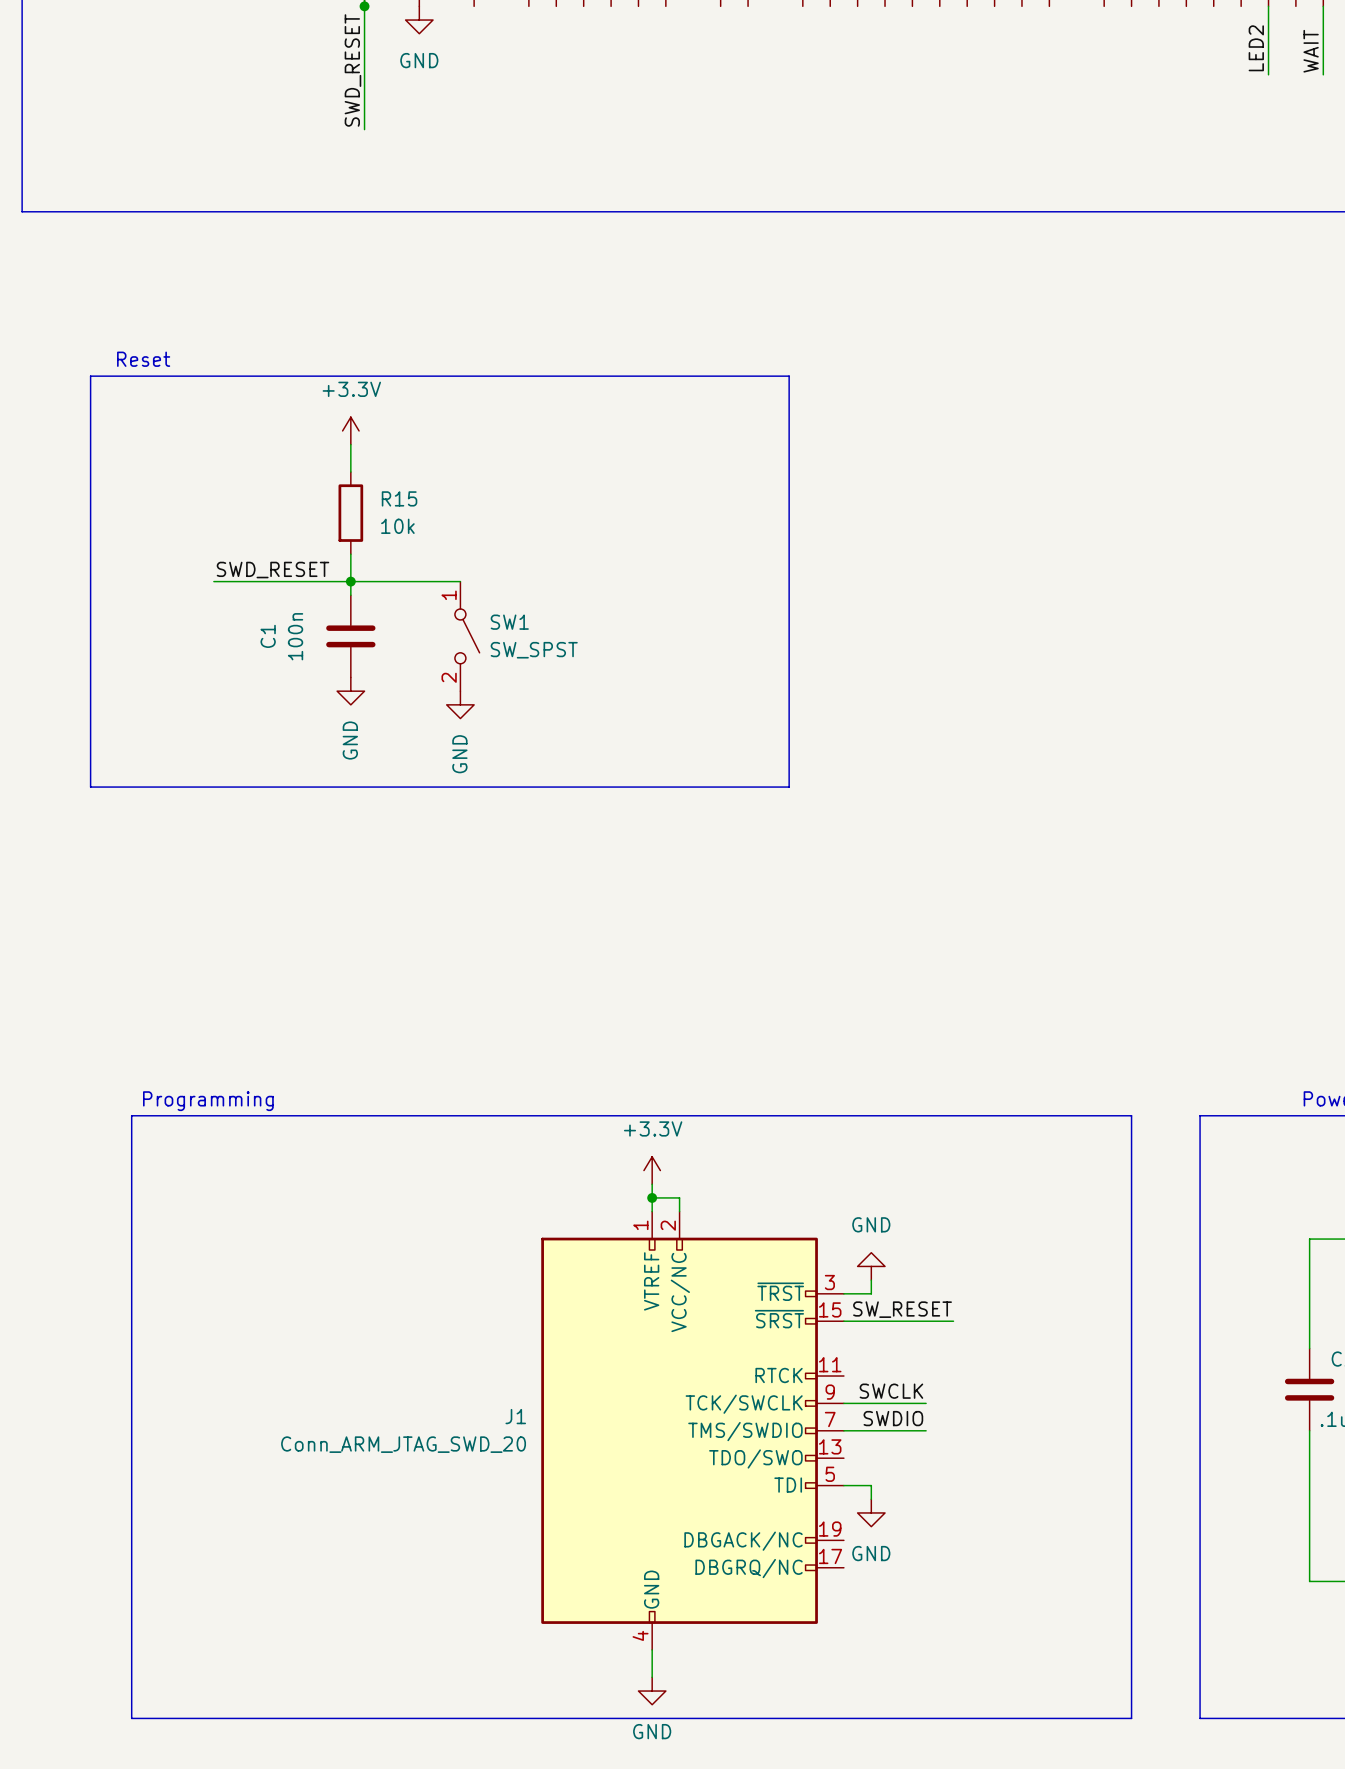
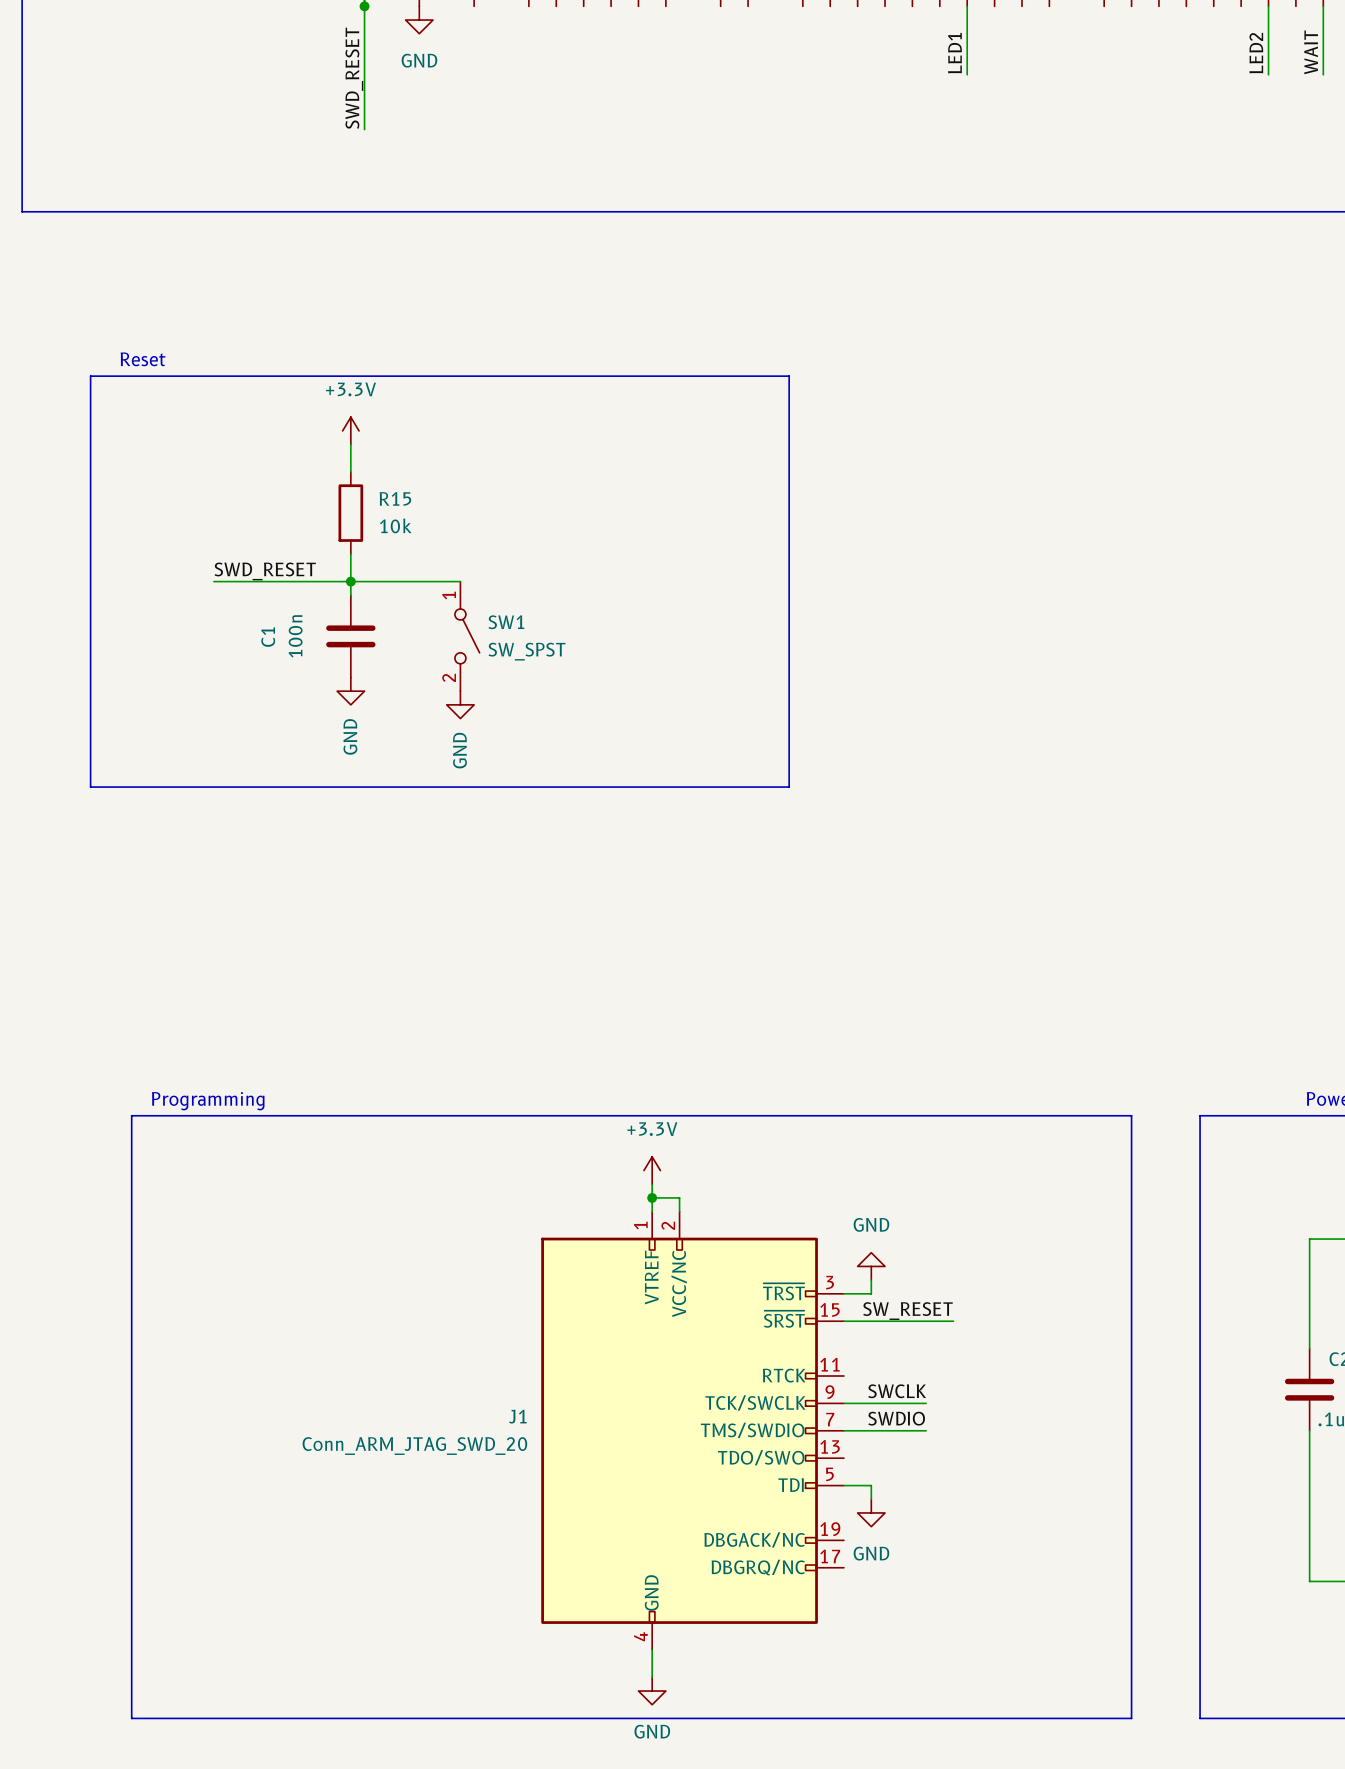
wire: none -> (967, 6) (967, 74)
label: none -> LED1 (954, 53)

